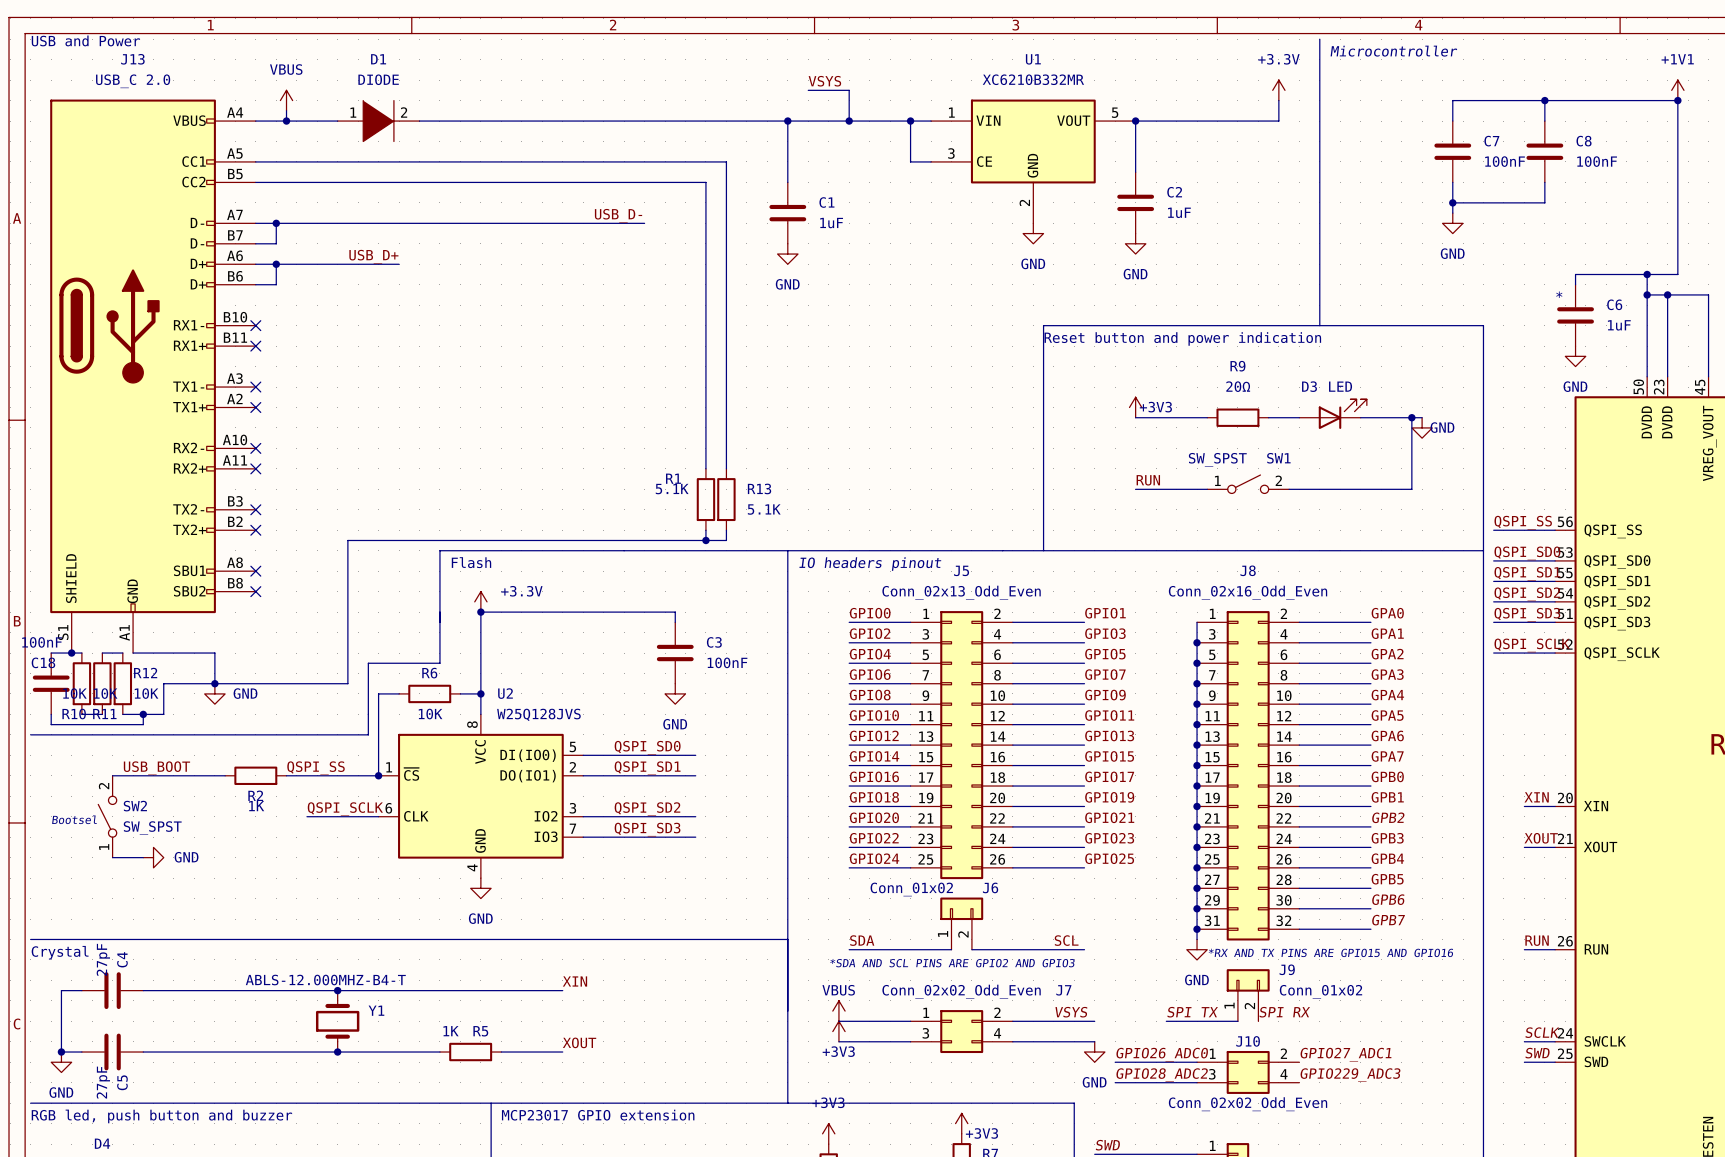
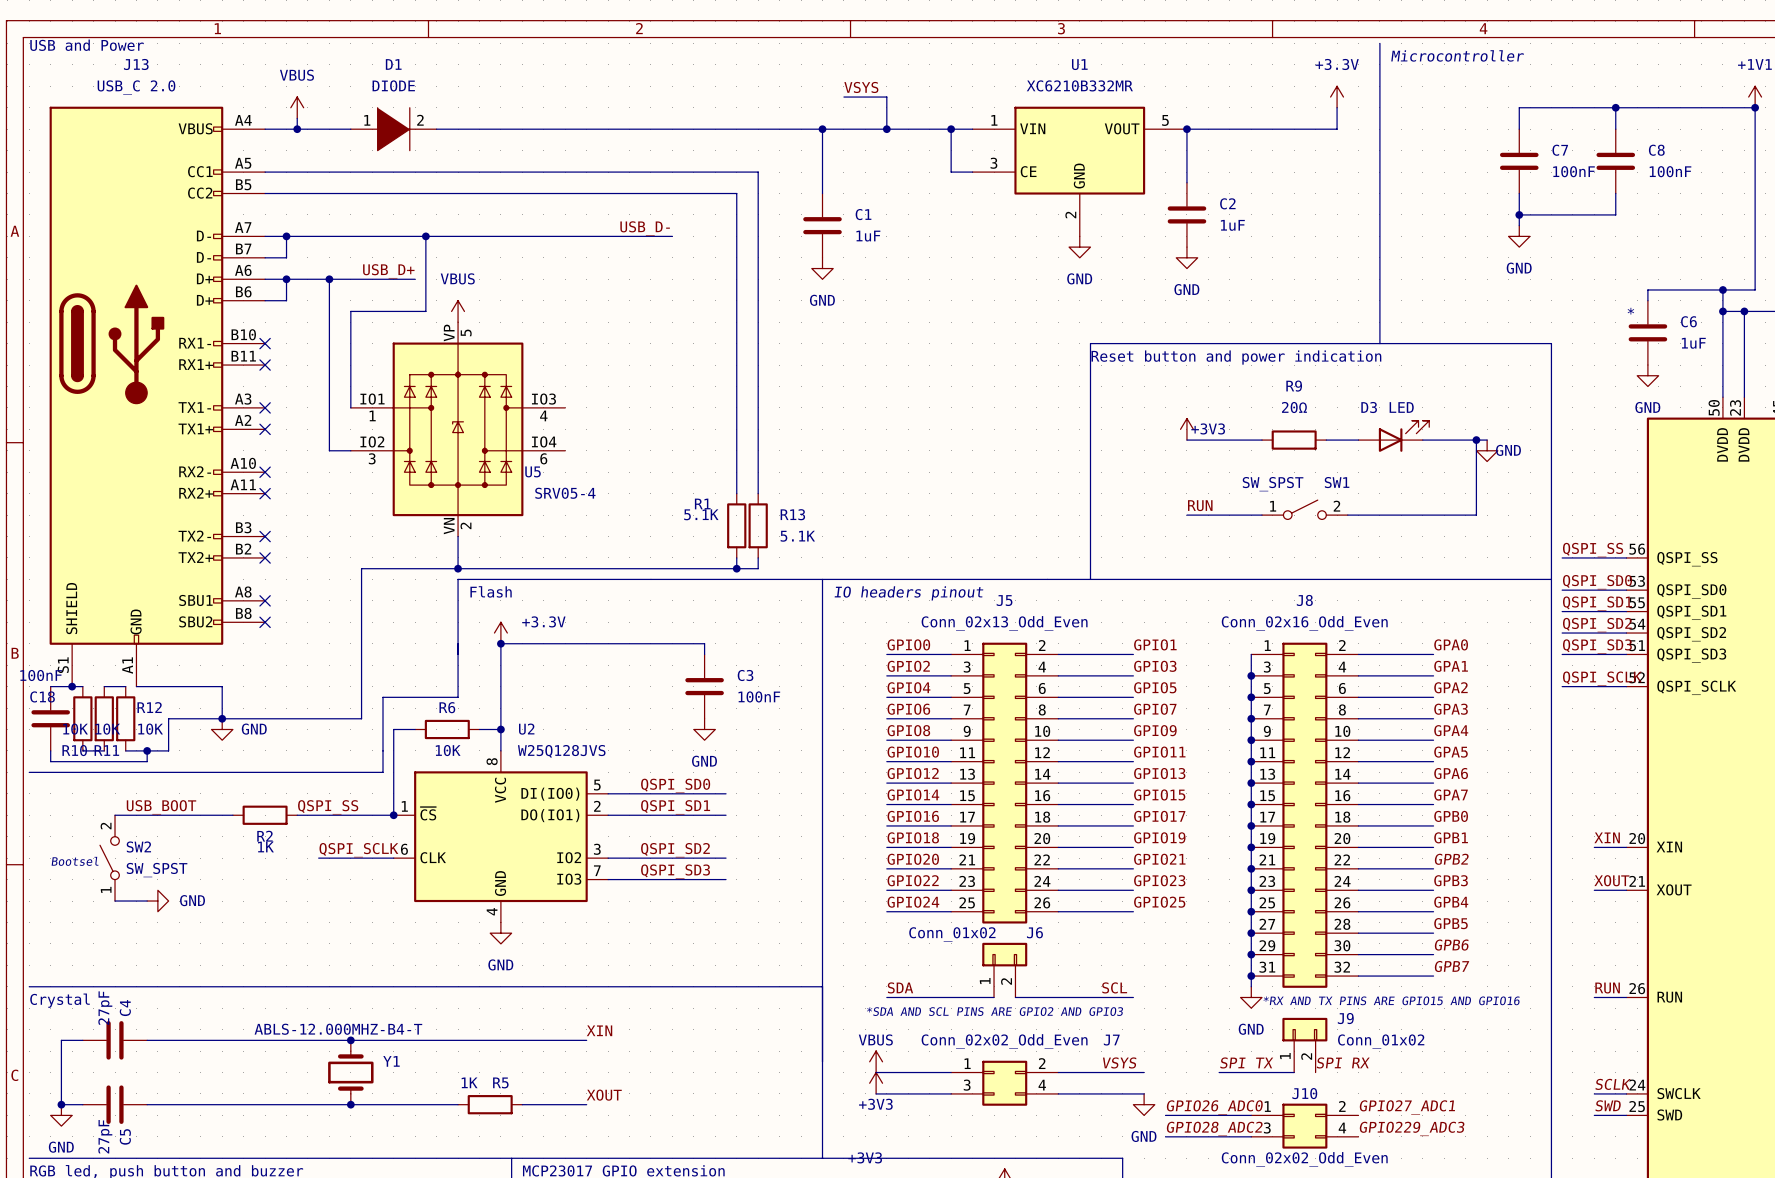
wire: none -> (425, 236) (425, 311) (350, 311) (350, 407)
junction: none -> (425, 236)
wire: none -> (329, 279) (329, 450) (350, 450)
junction: none -> (329, 279)
power symbol: none -> VBUS (458, 311)
U5: none -> SRV05-4 (458, 429)
wire: none -> (458, 536) (458, 568)
junction: none -> (458, 568)

